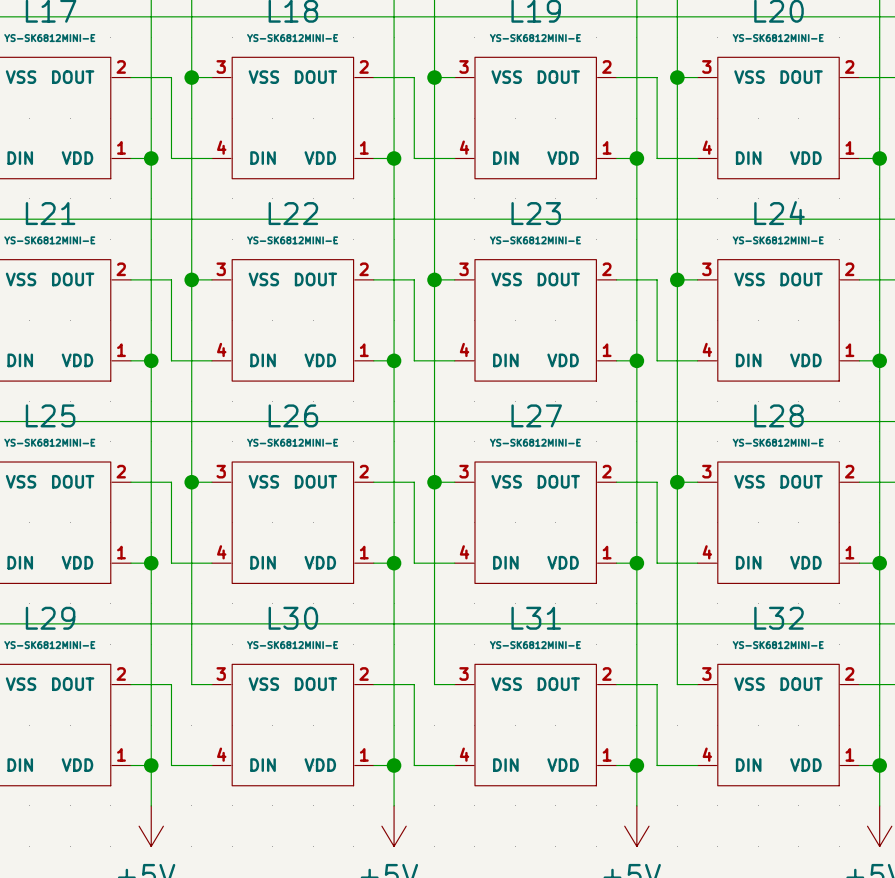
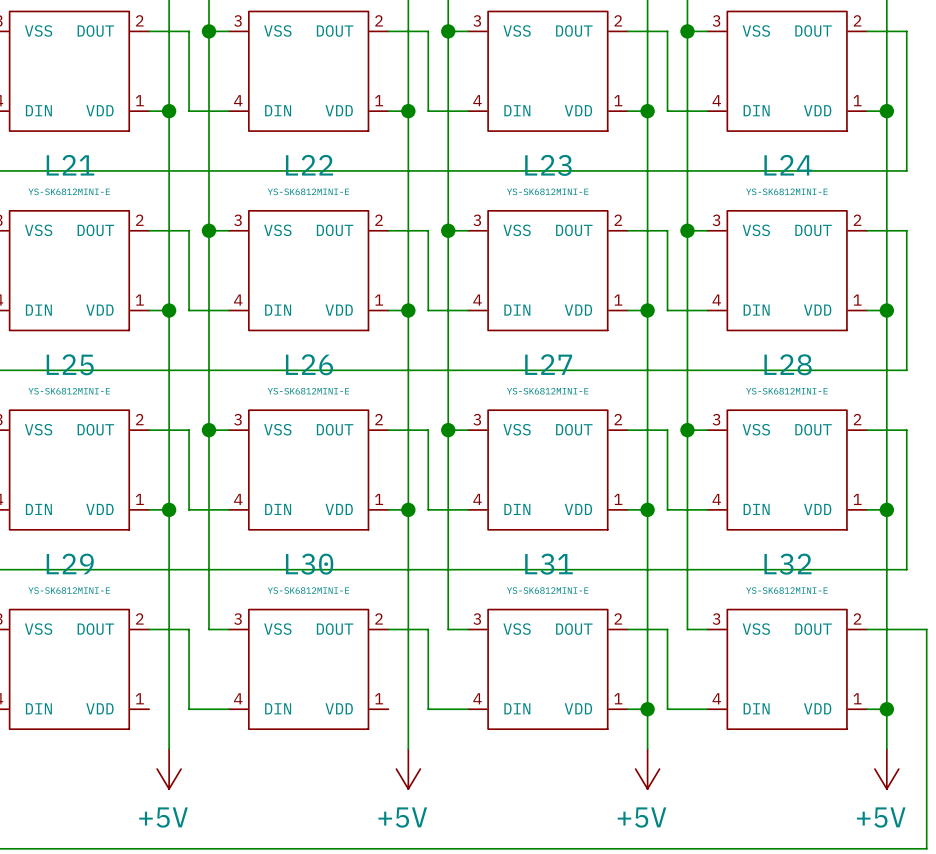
wire: (131, 765) (151, 765) -> none
junction: (151, 765) -> none
wire: (373, 765) (394, 765) -> none
junction: (394, 765) -> none

